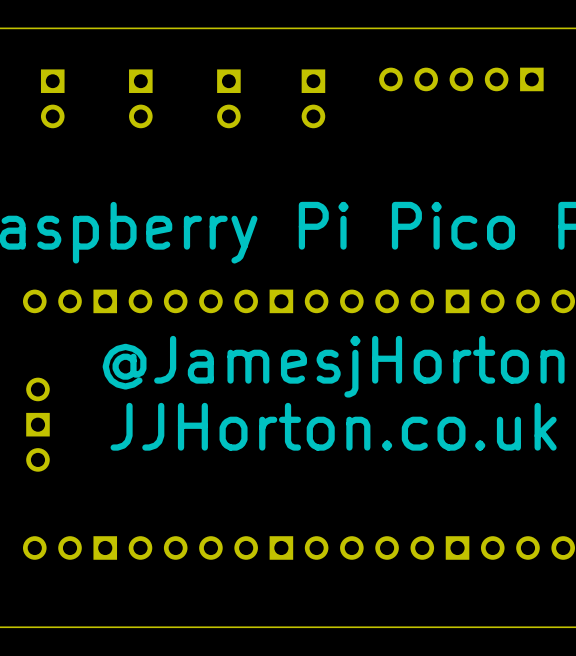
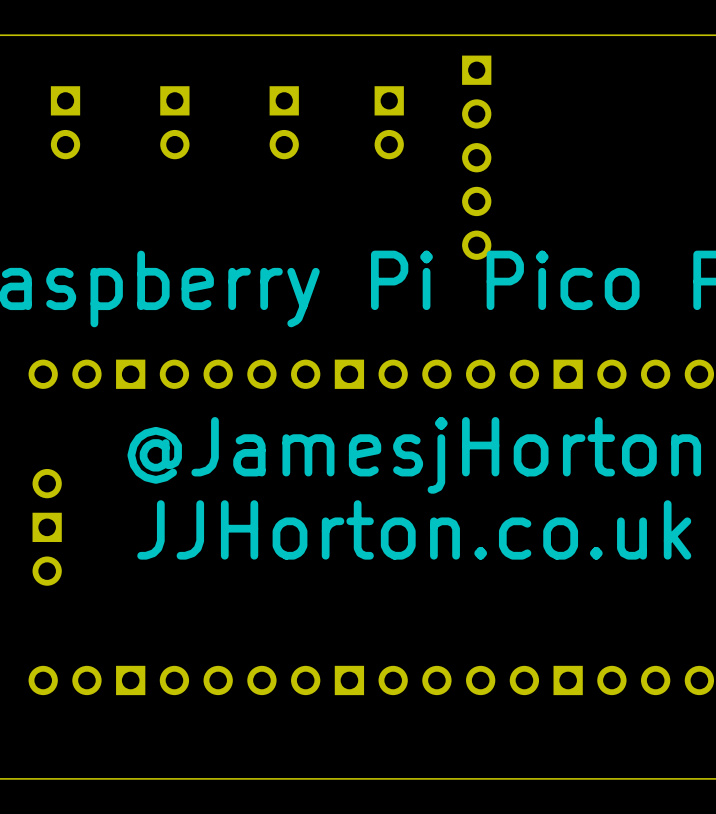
part rotation: 0° (461, 79) -> 90° counterclockwise (476, 157)

